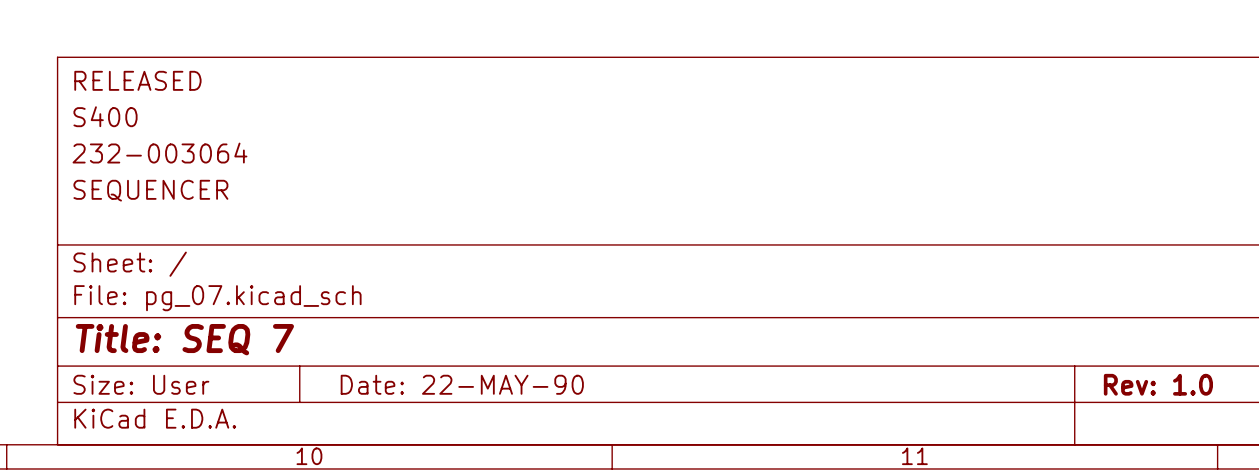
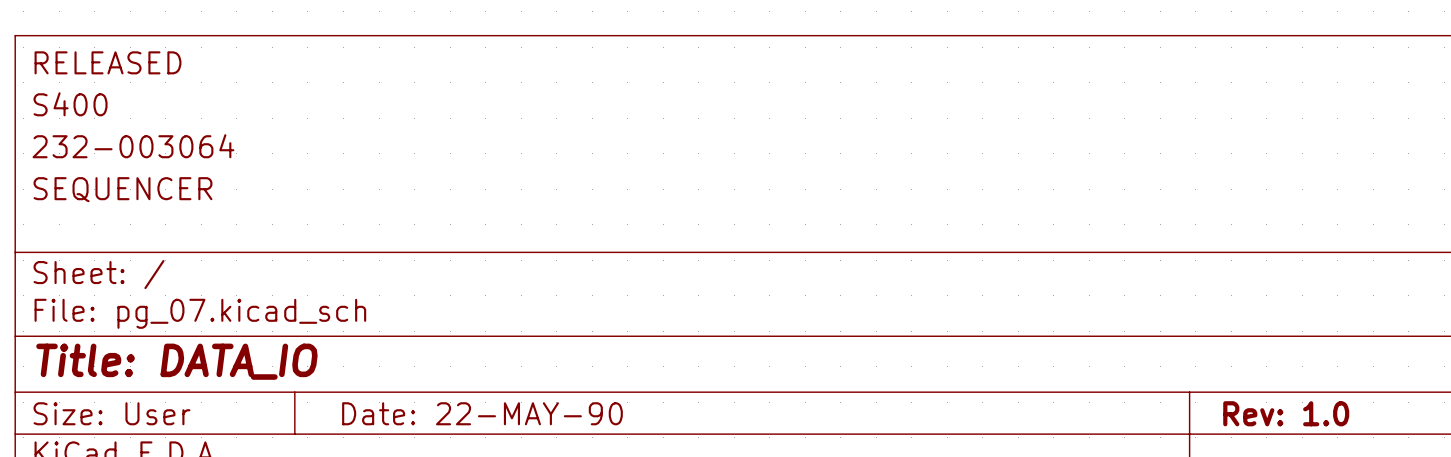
title block: Title: SEQ 7 (184, 339) -> Title: DATA_IO (176, 361)

